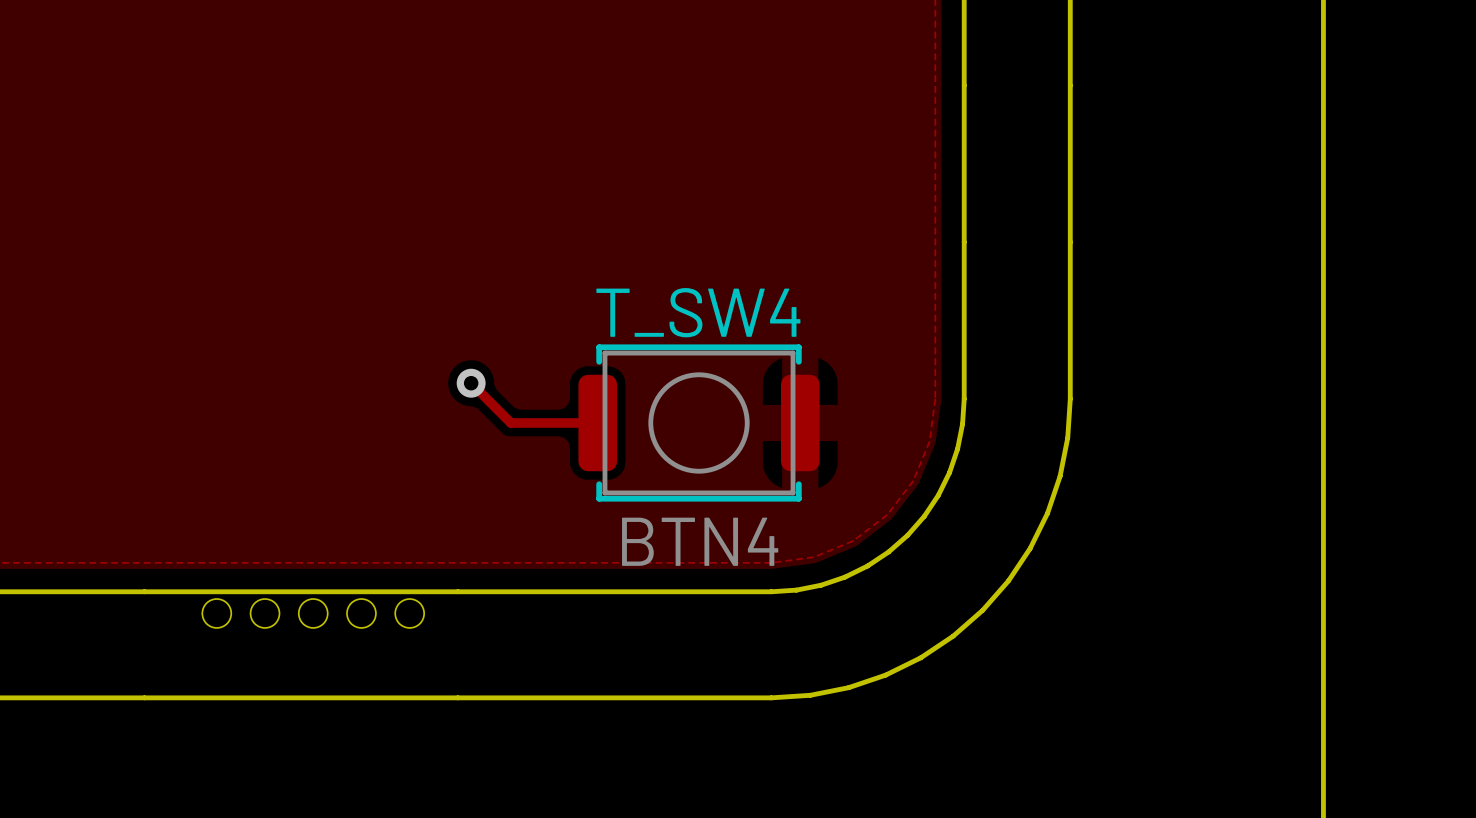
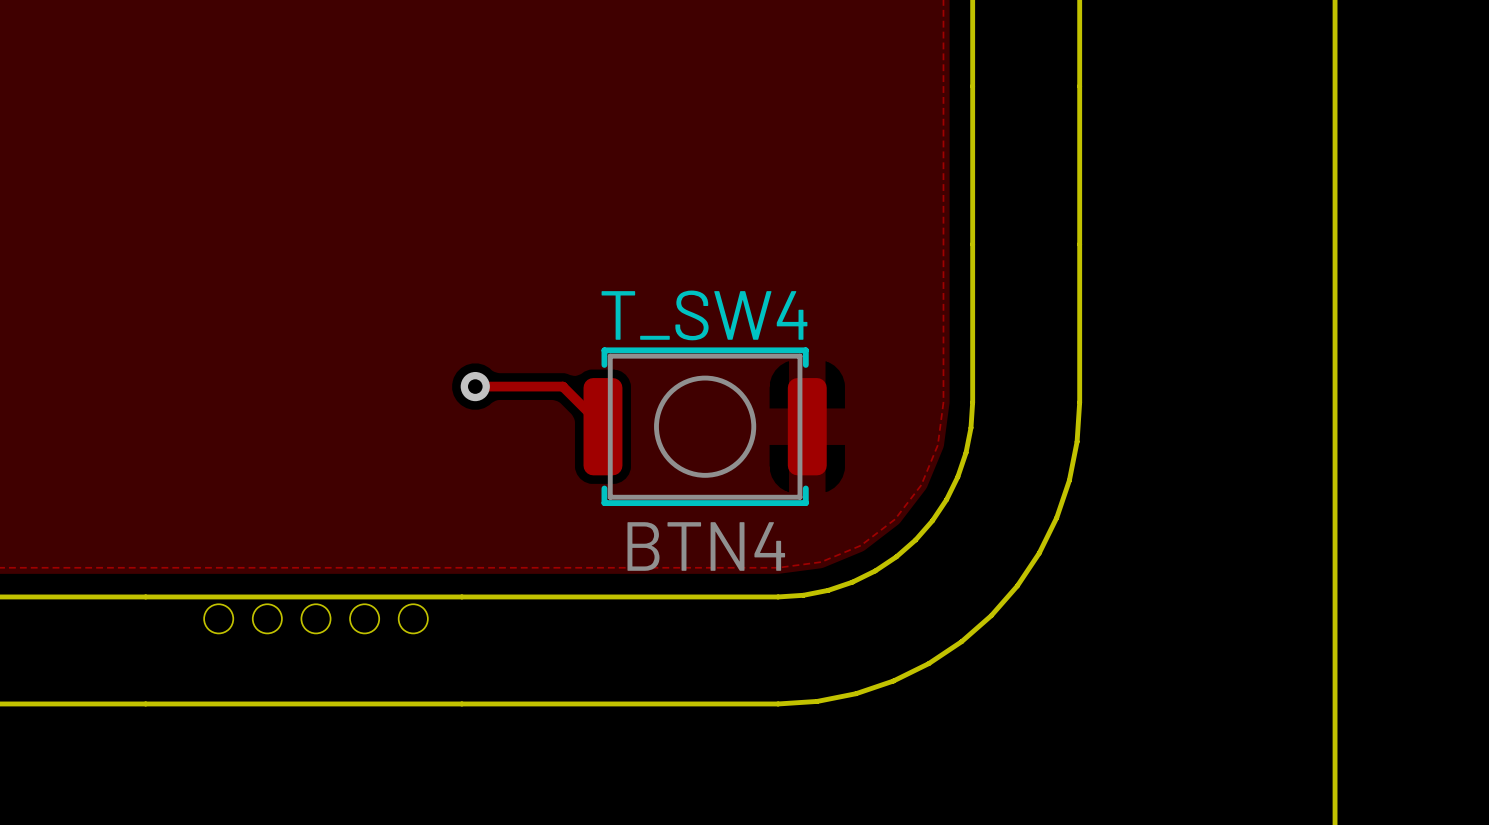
track: (471, 383) (510, 423) (597, 423) -> (475, 386) (562, 386) (602, 426)

